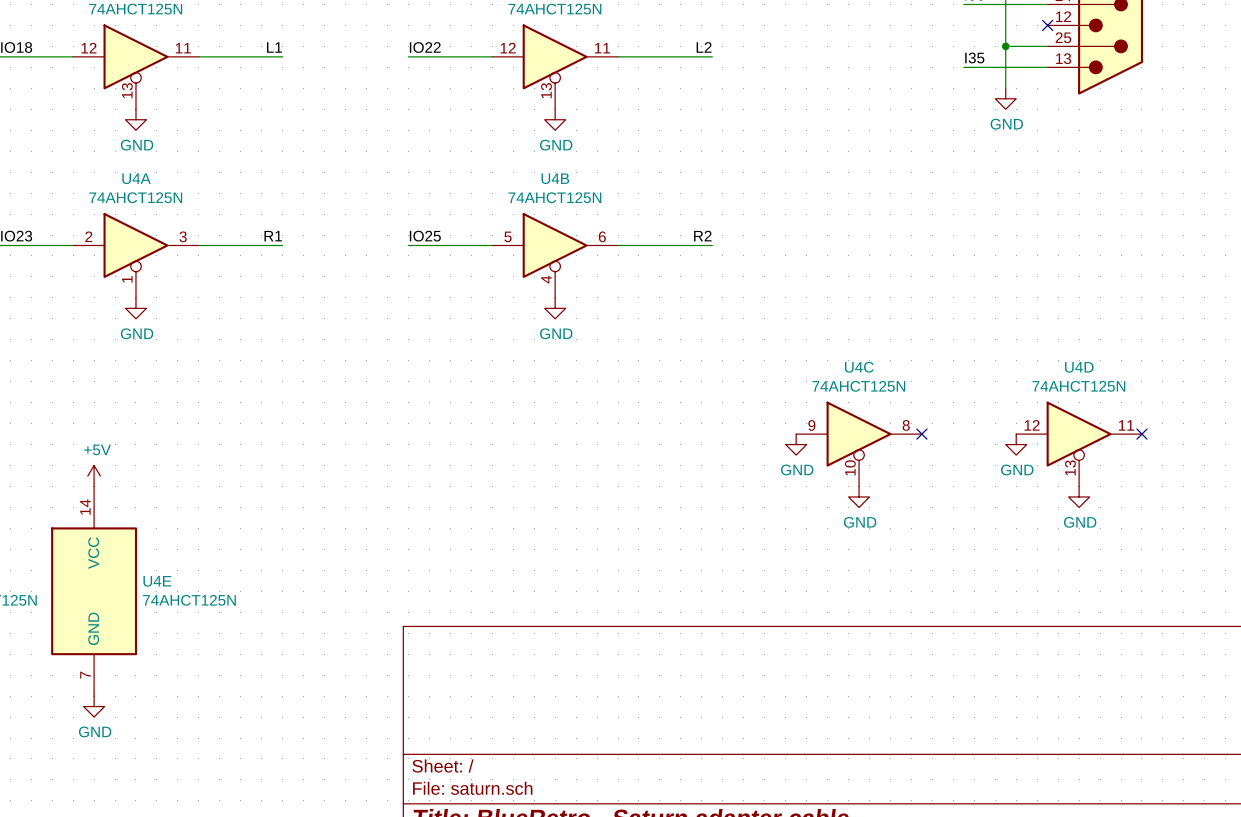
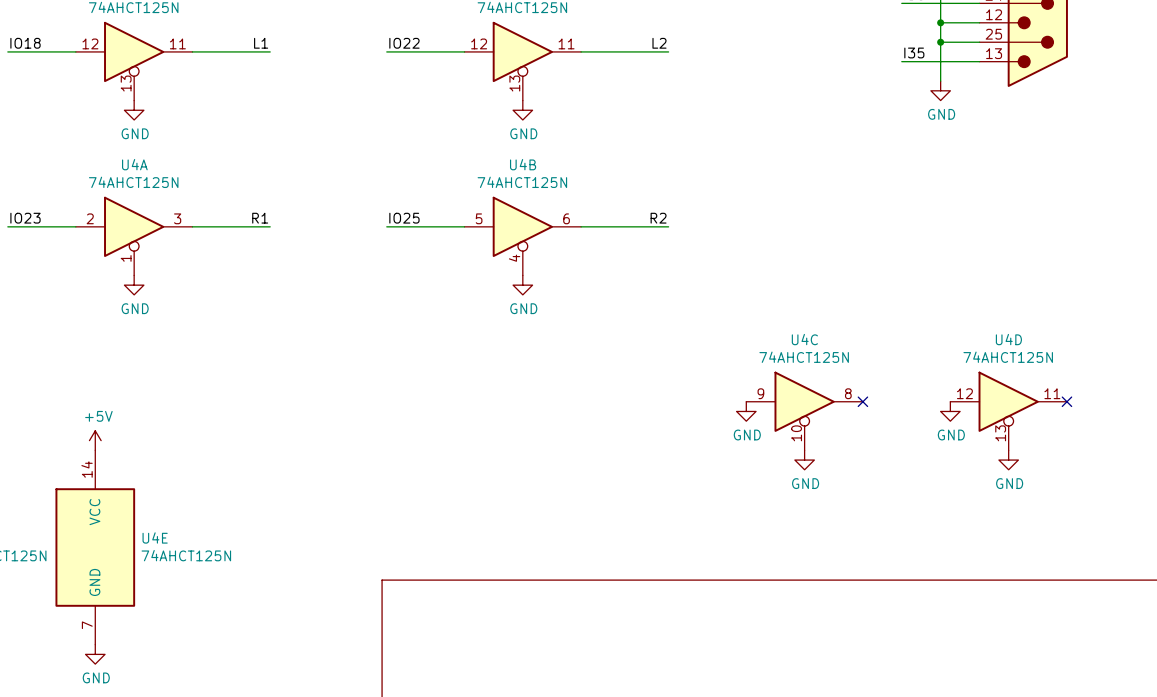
wire: none -> (940, 22) (979, 22)
junction: none -> (940, 22)
no-connect mark: (1047, 25) -> none

